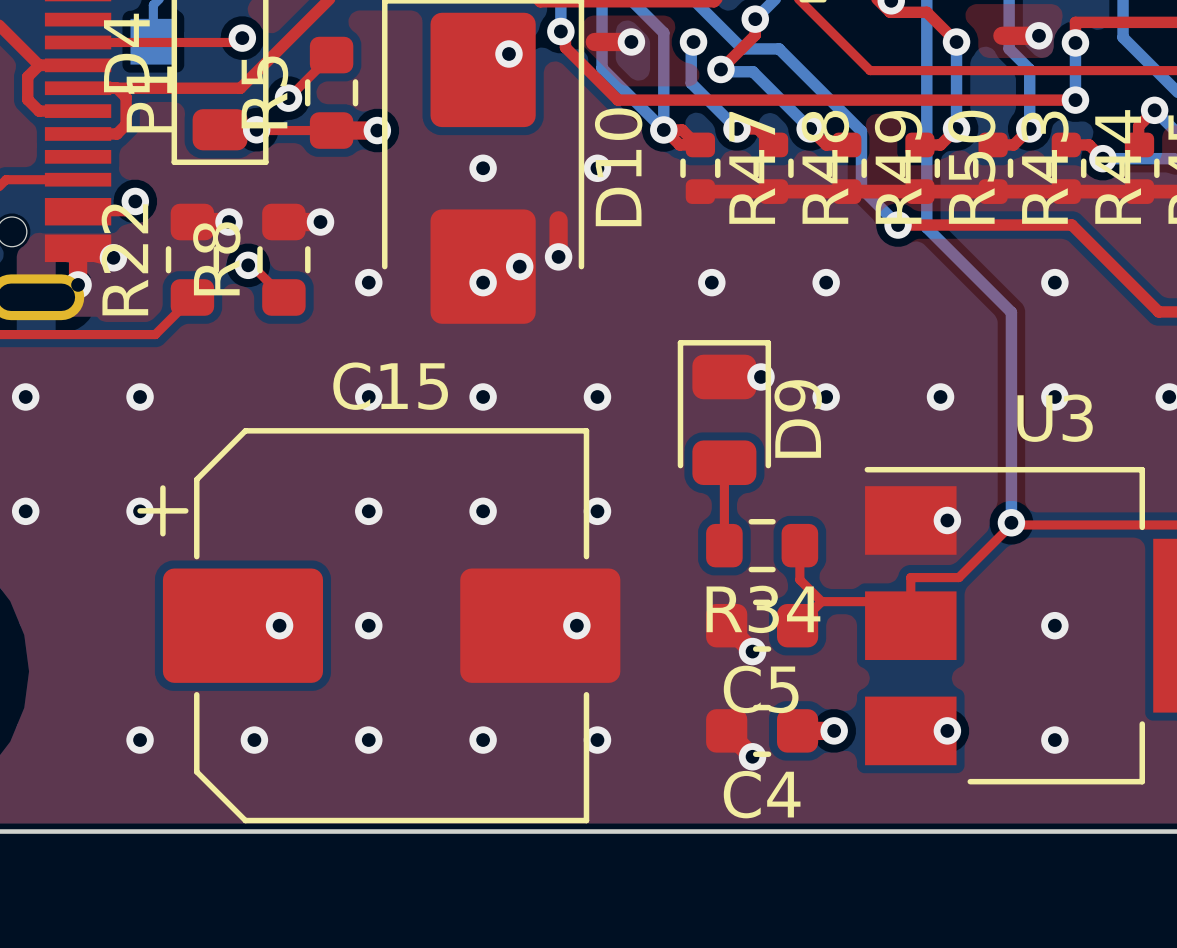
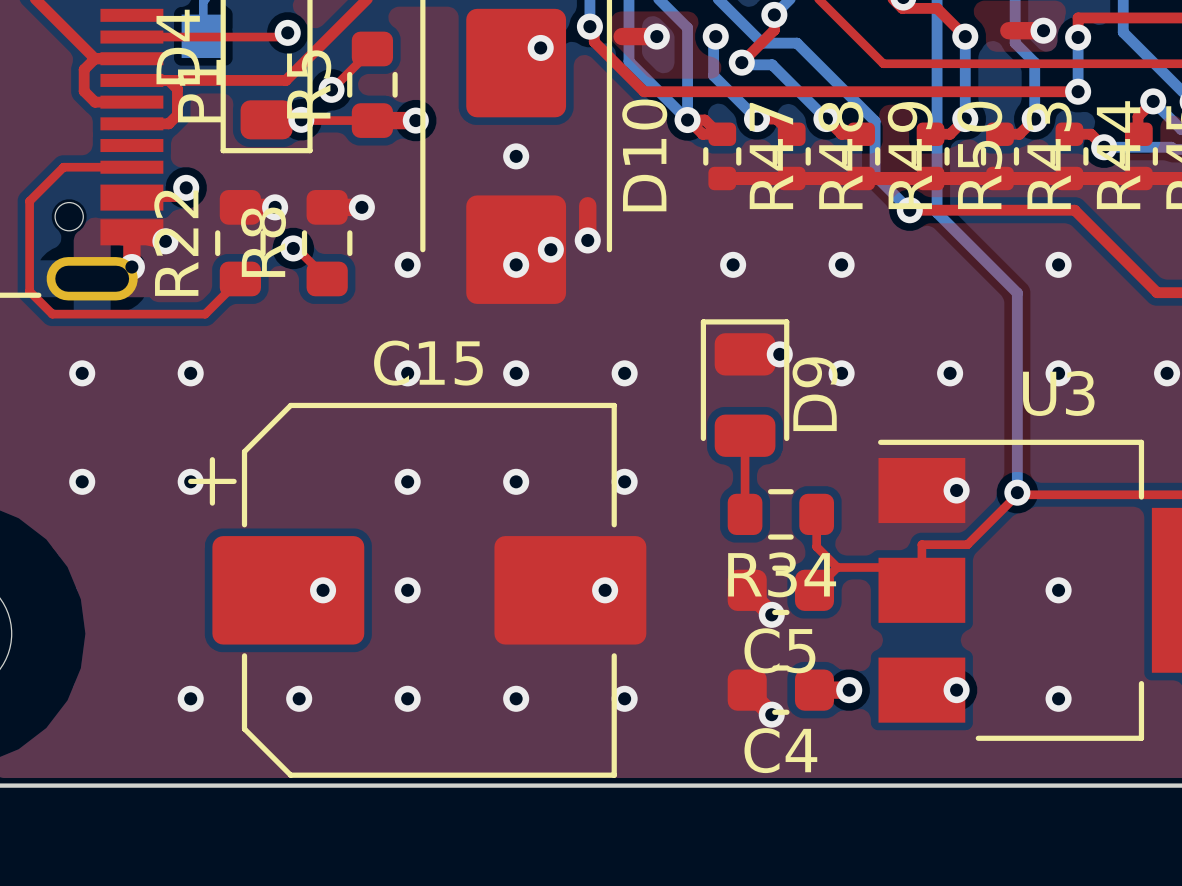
via: (597, 168) -> none

